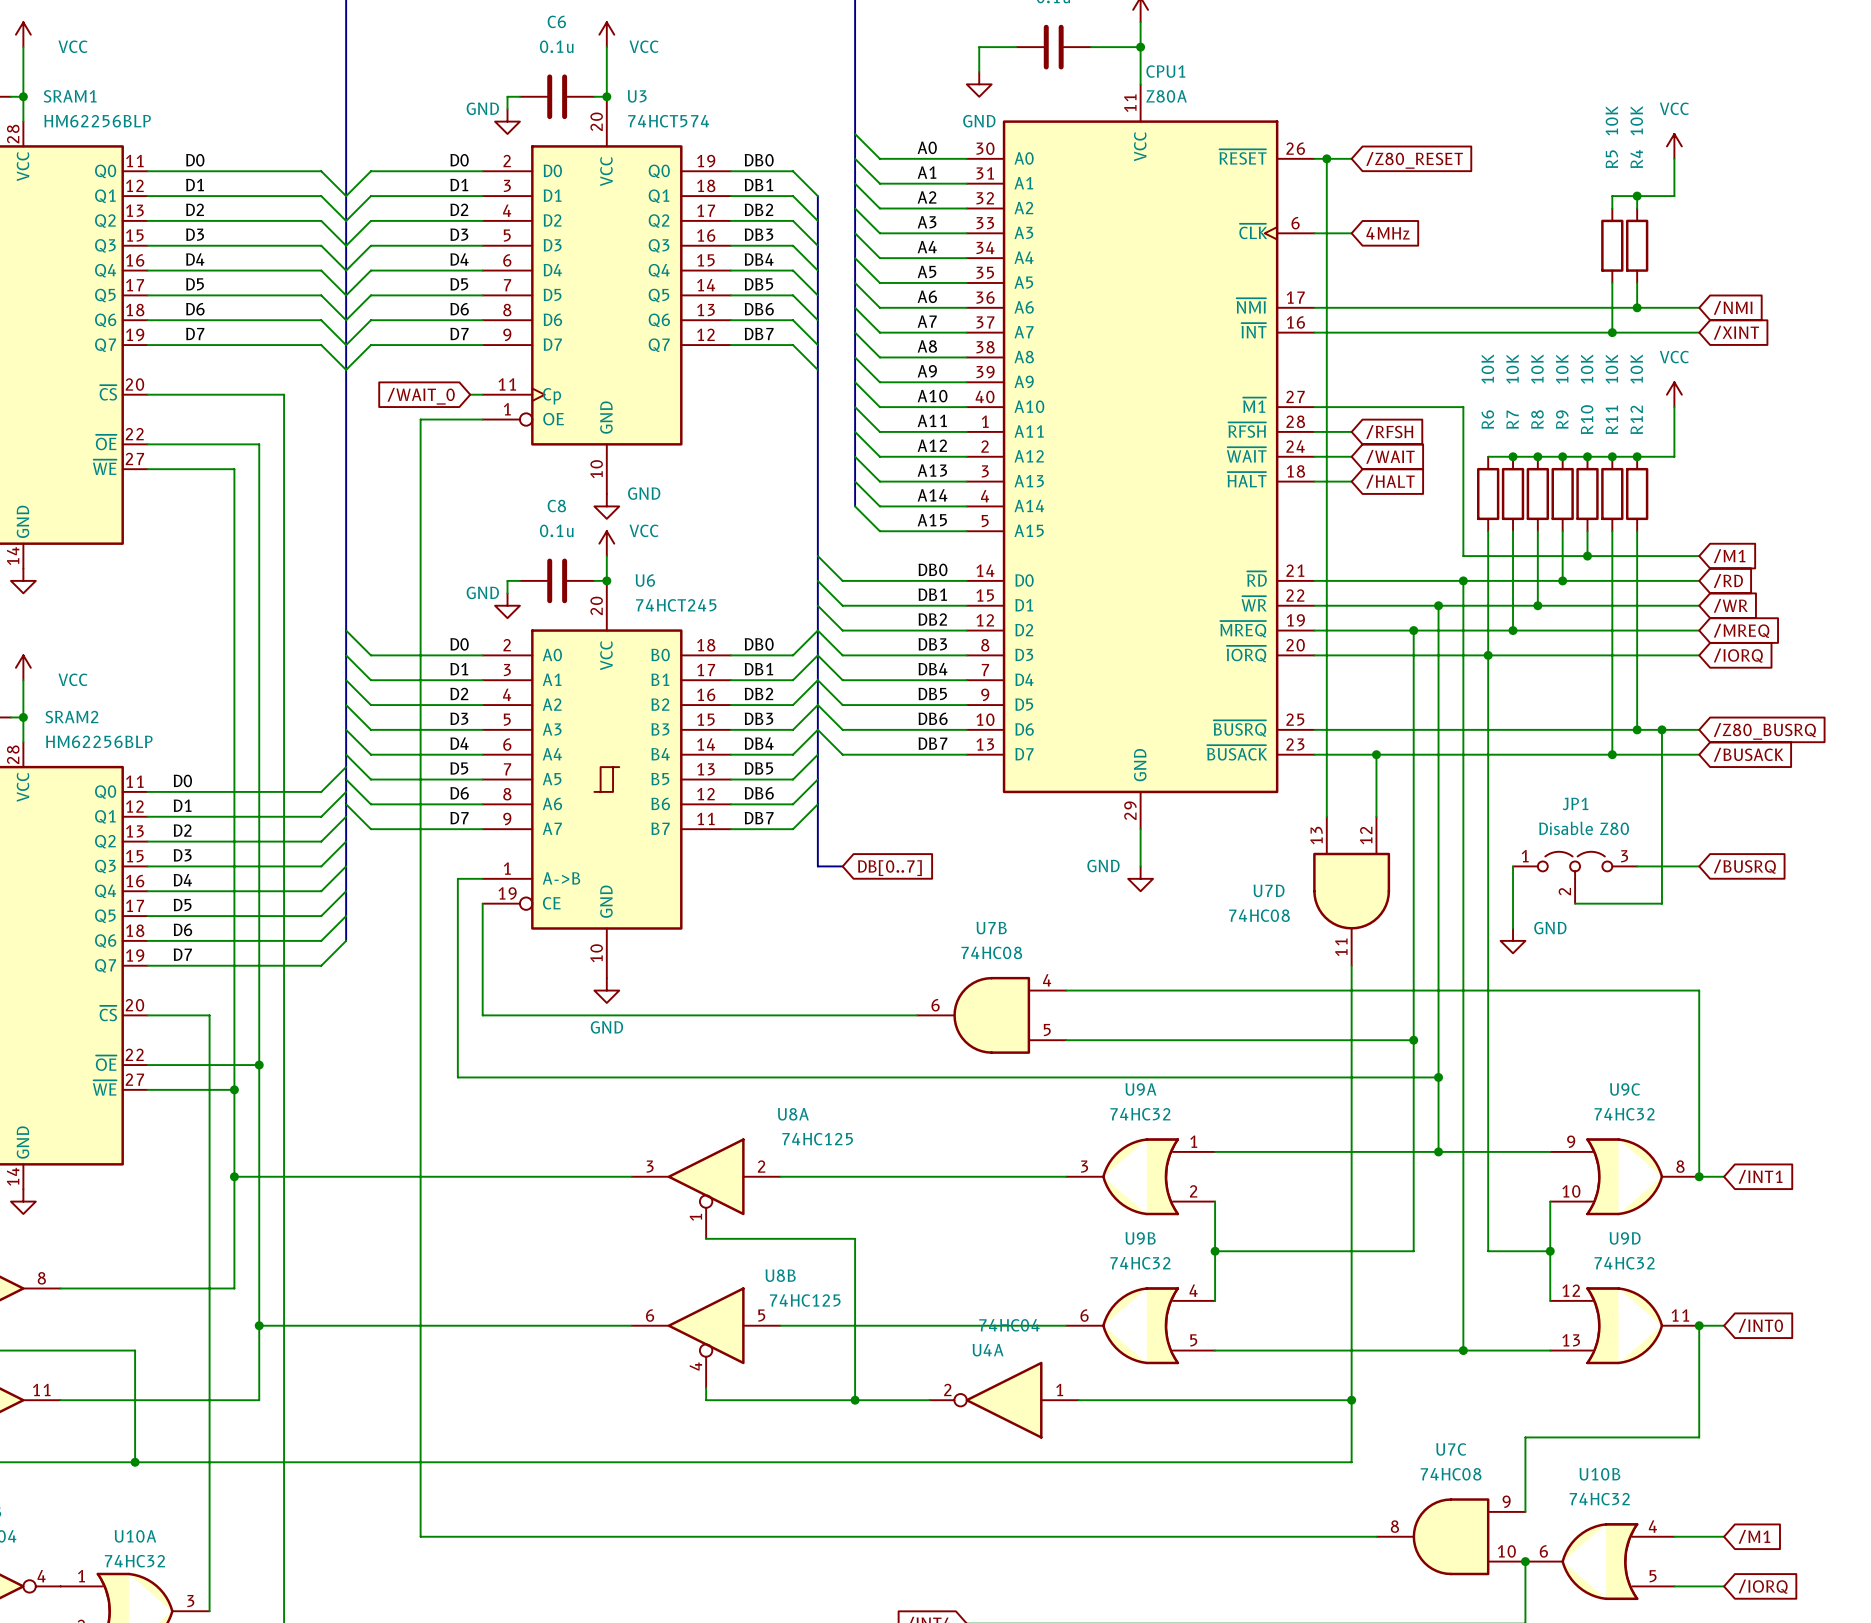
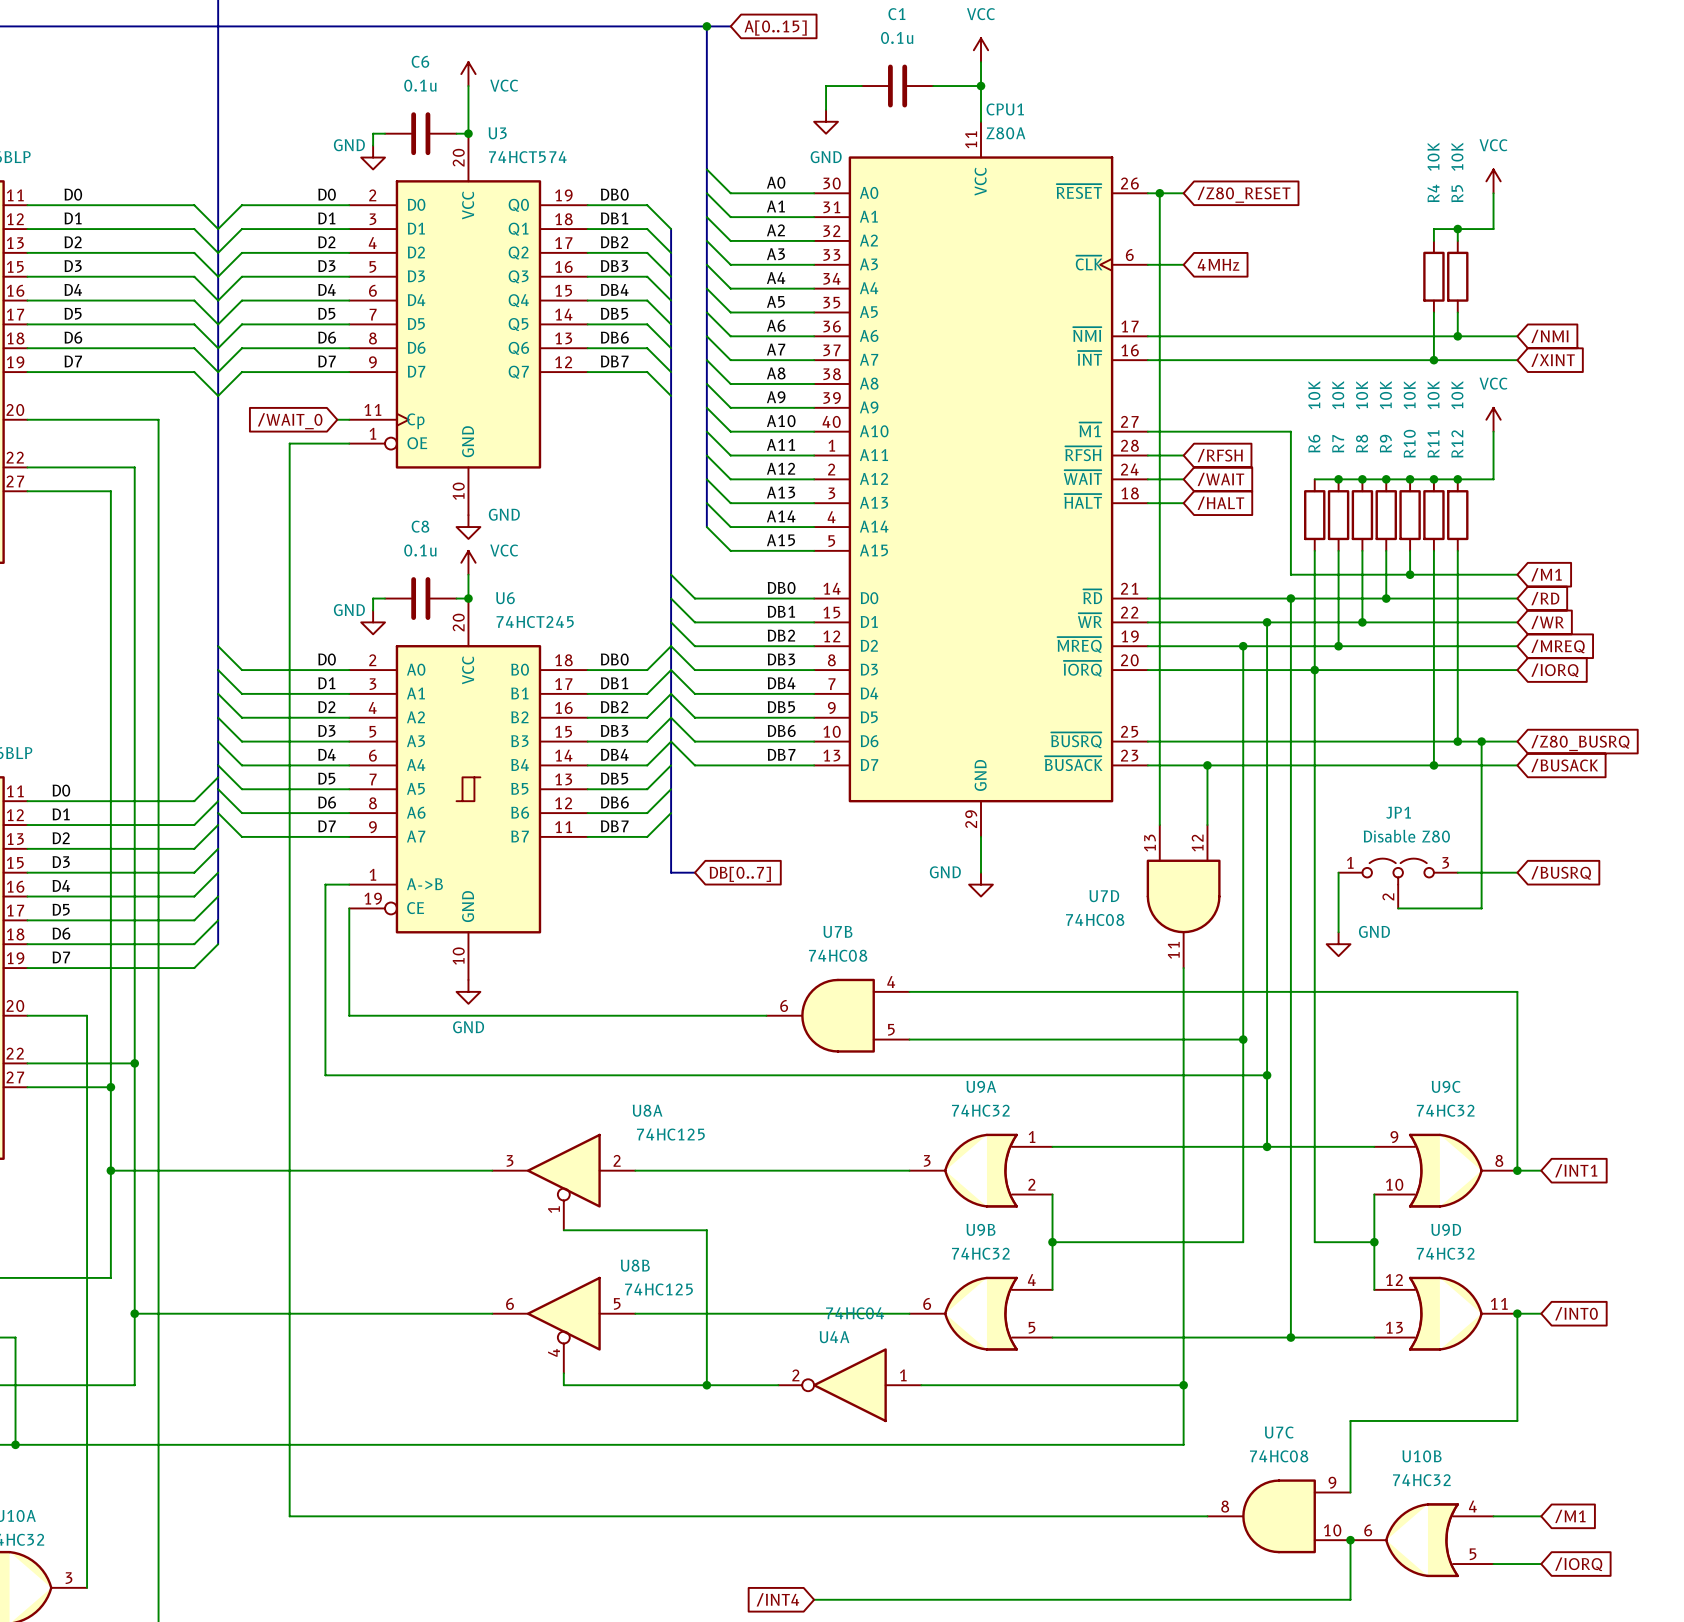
R5 name: R5 (1611, 159) -> R4 (1433, 193)
R4 name: R4 (1636, 159) -> R5 (1457, 193)

